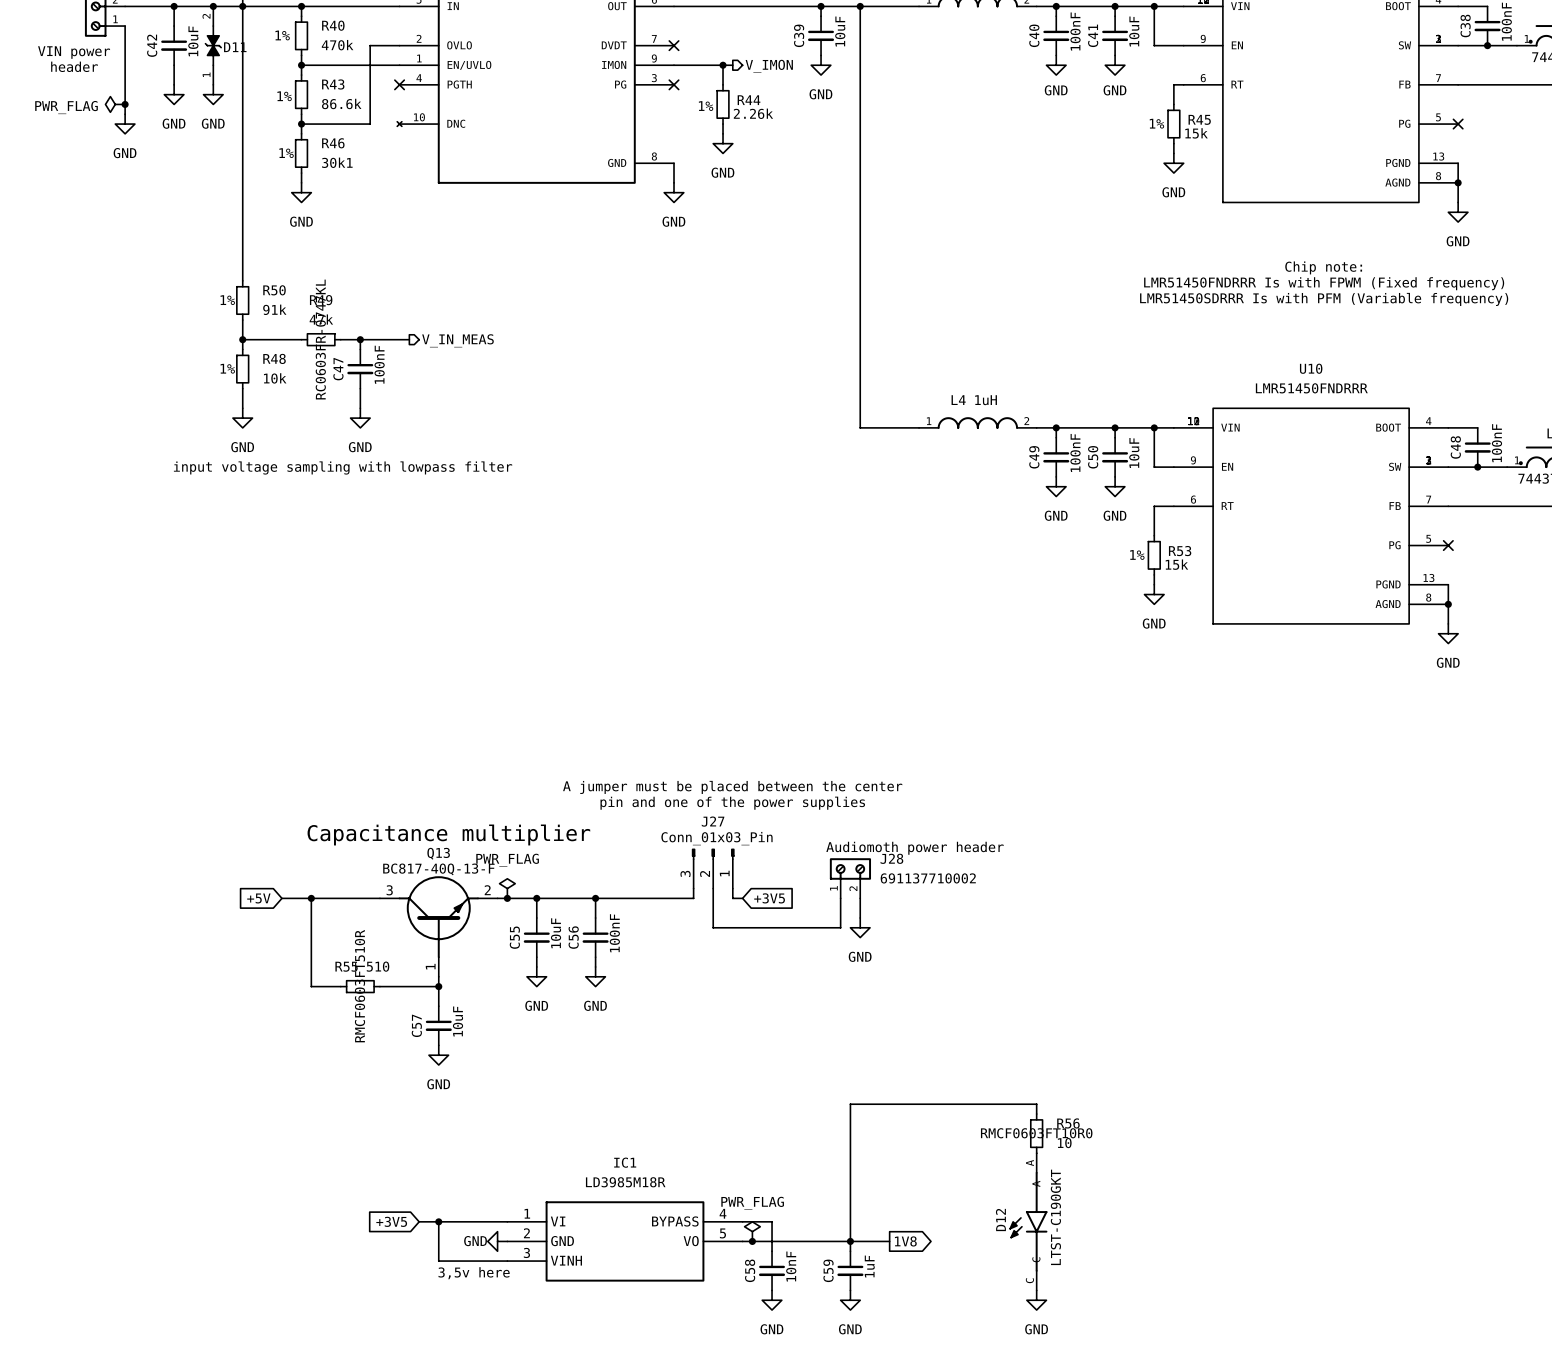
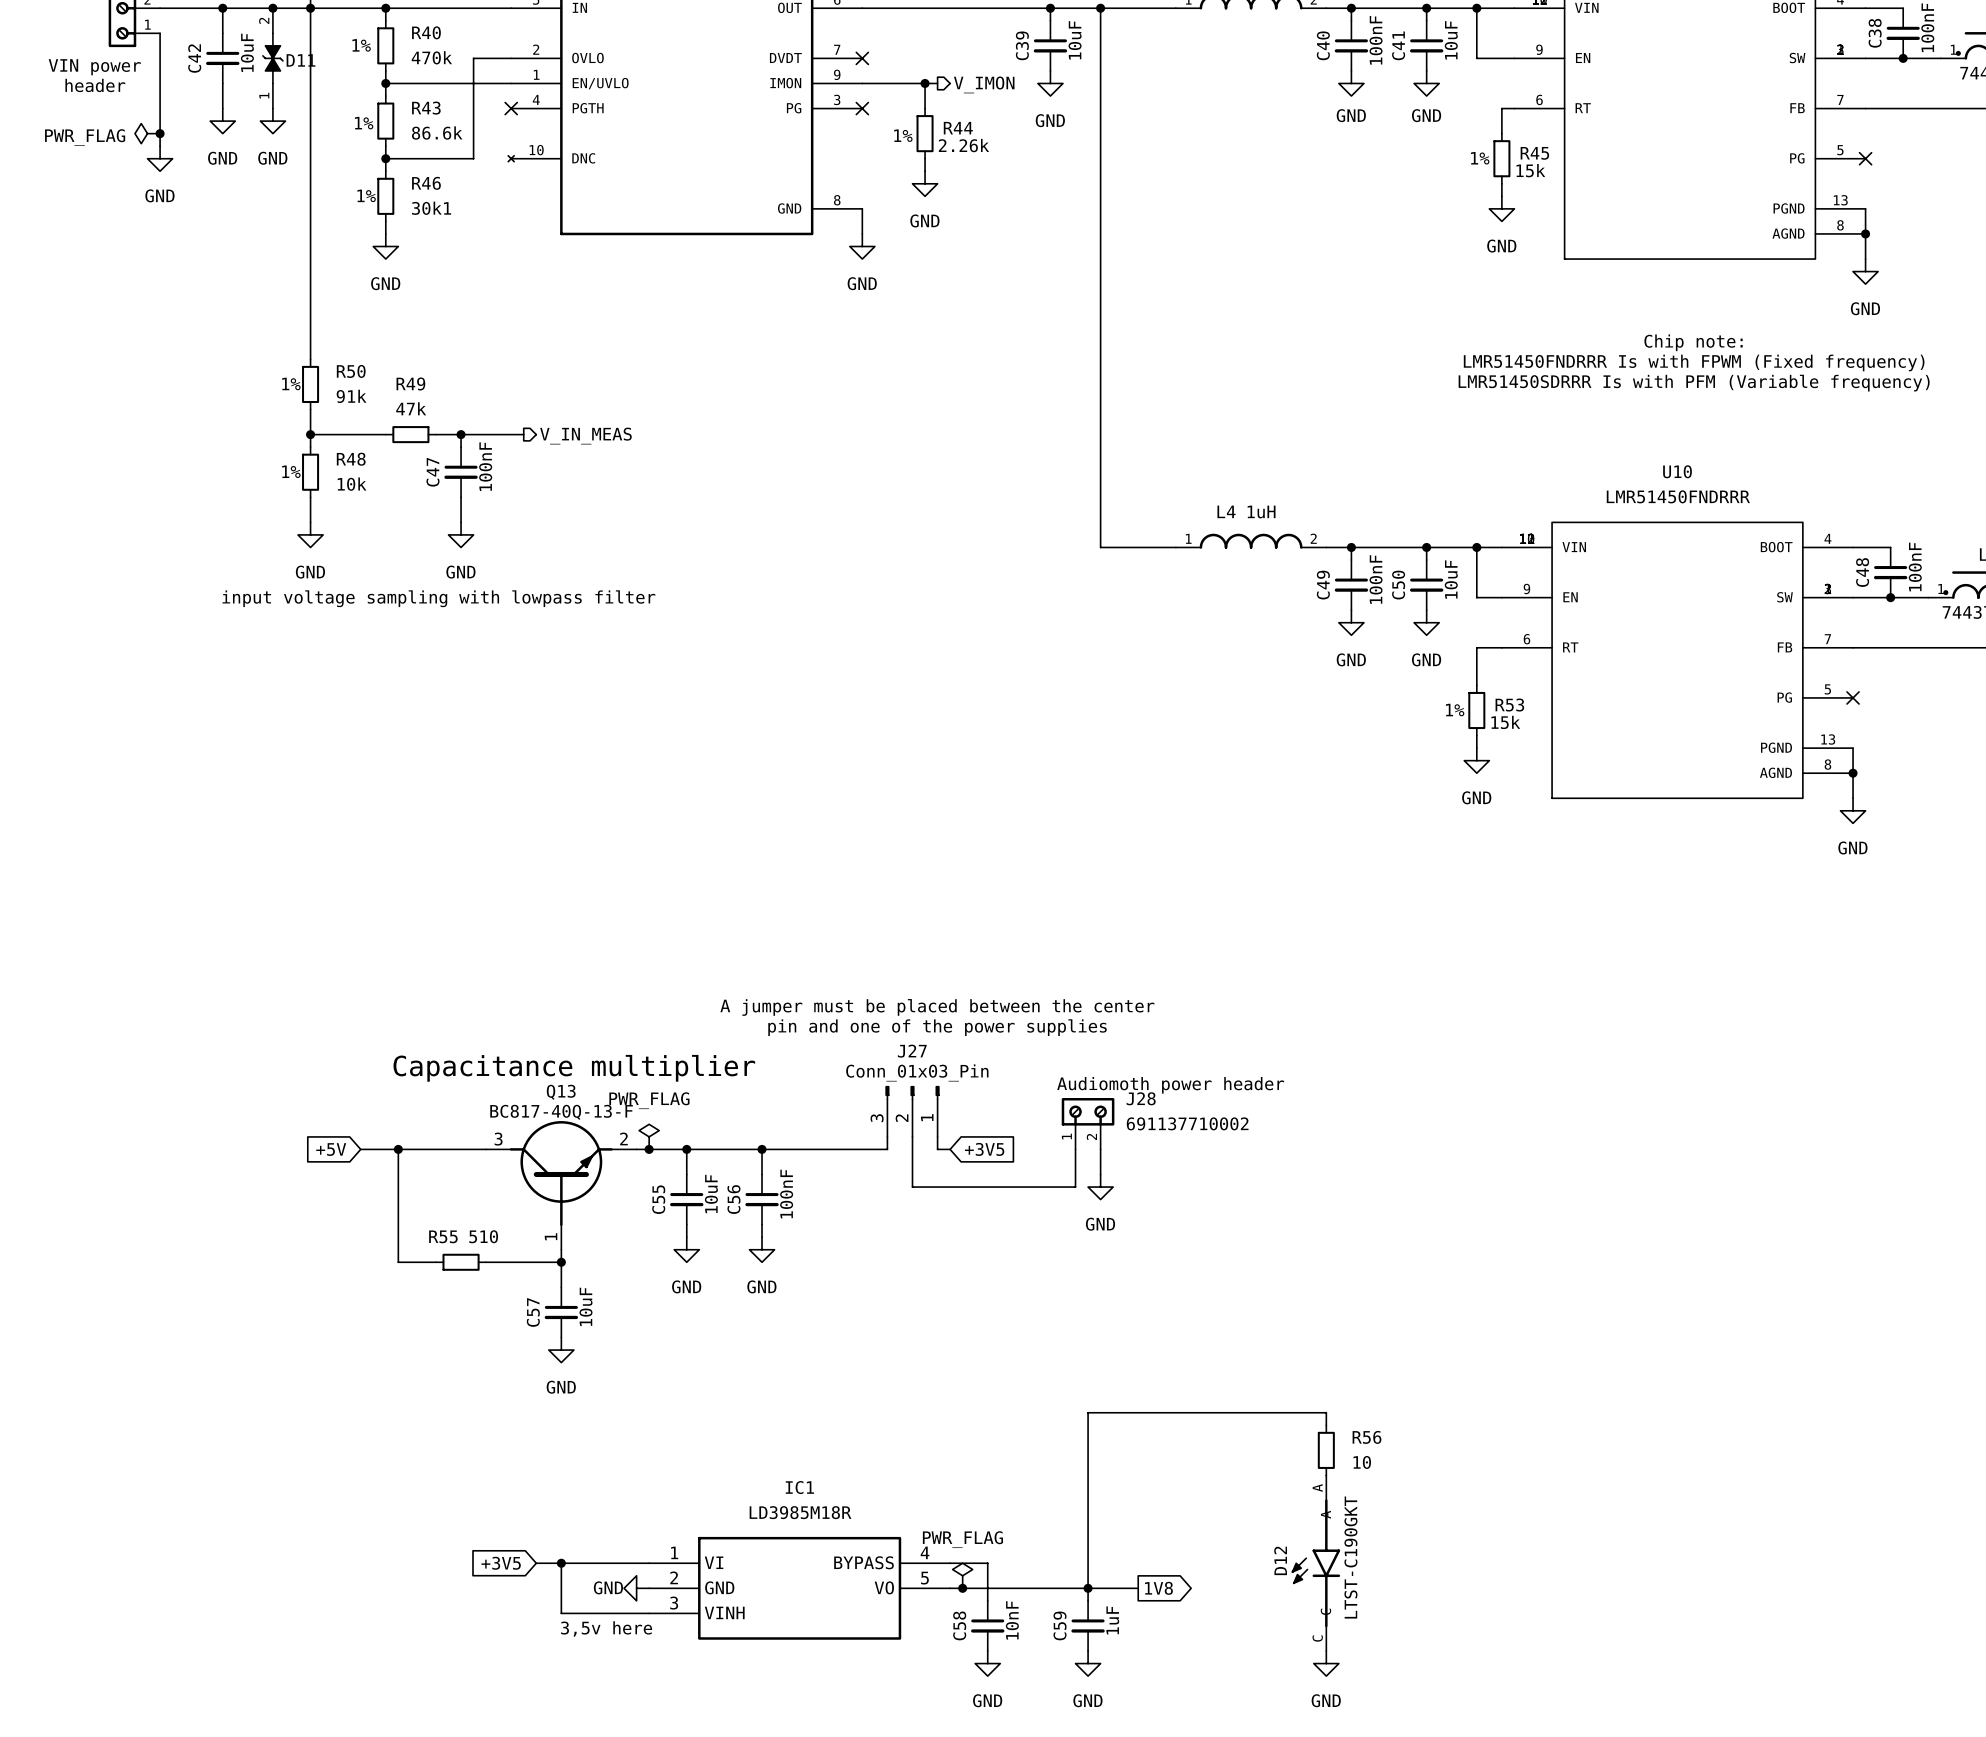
R49 text: RC0603FR-0747KL (320, 339) -> none
R55 text: RMCF0603FT510R (359, 986) -> none
R56 text: RMCF0603FT10R0 (1036, 1133) -> none

